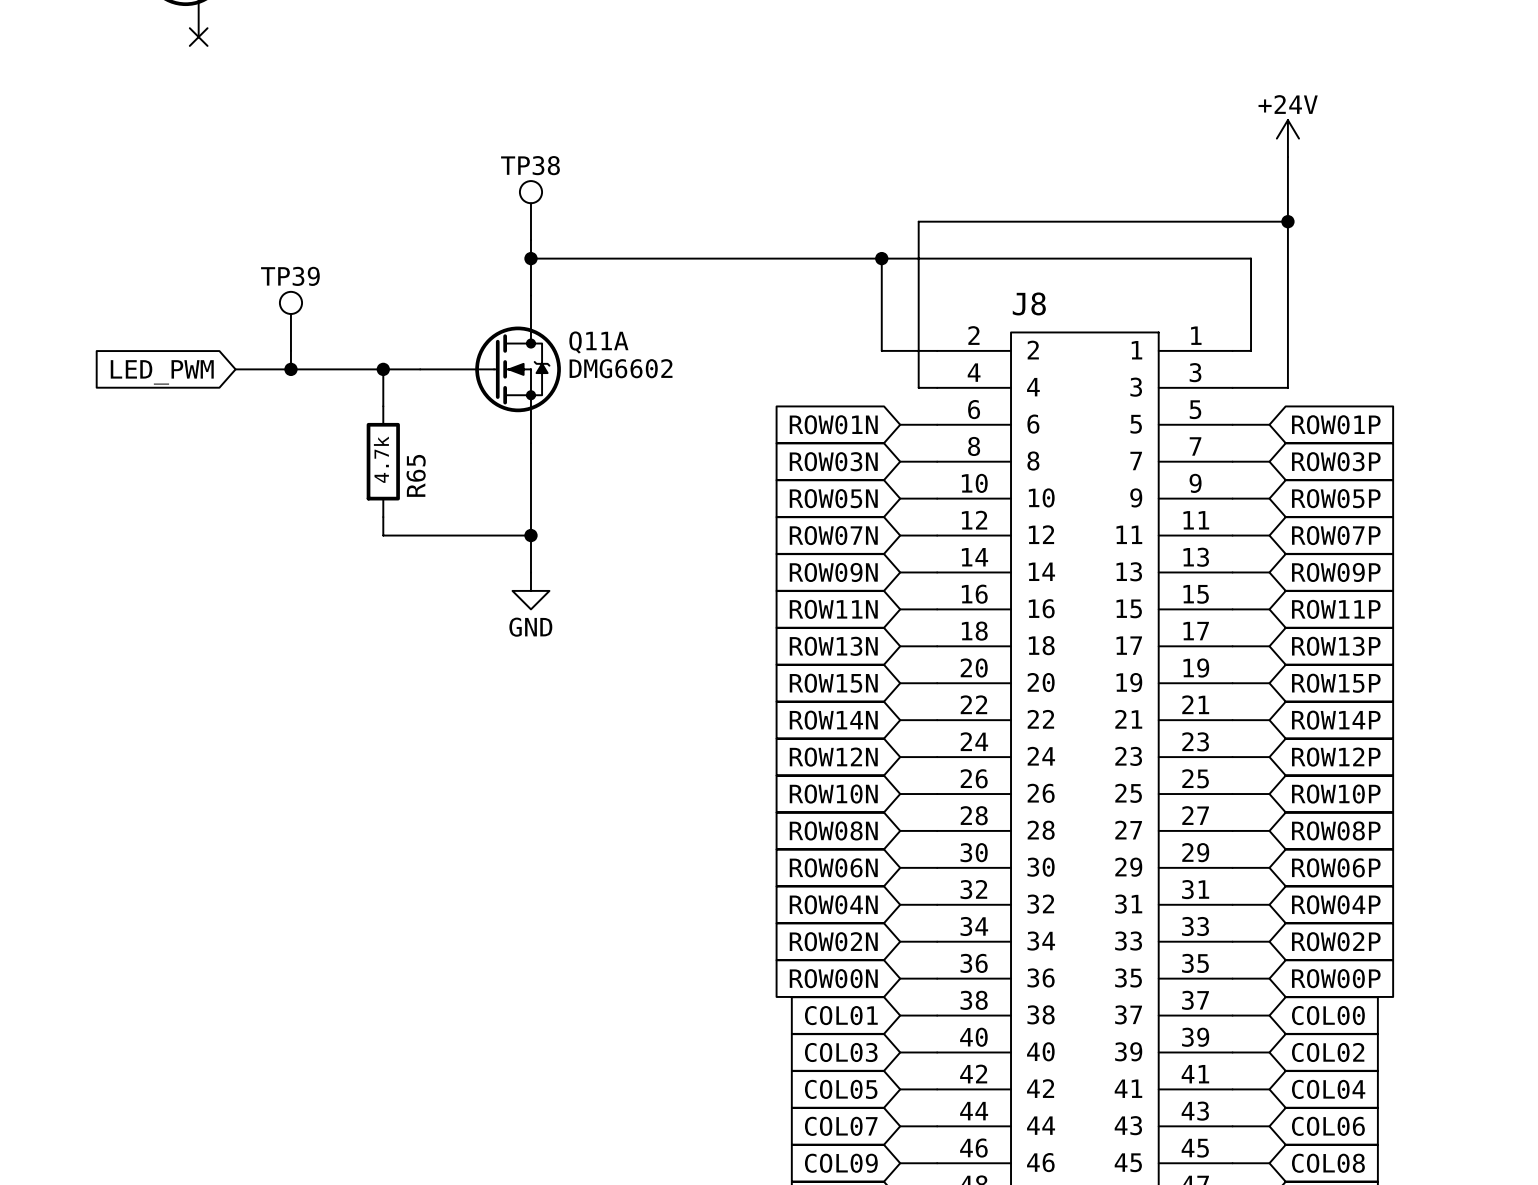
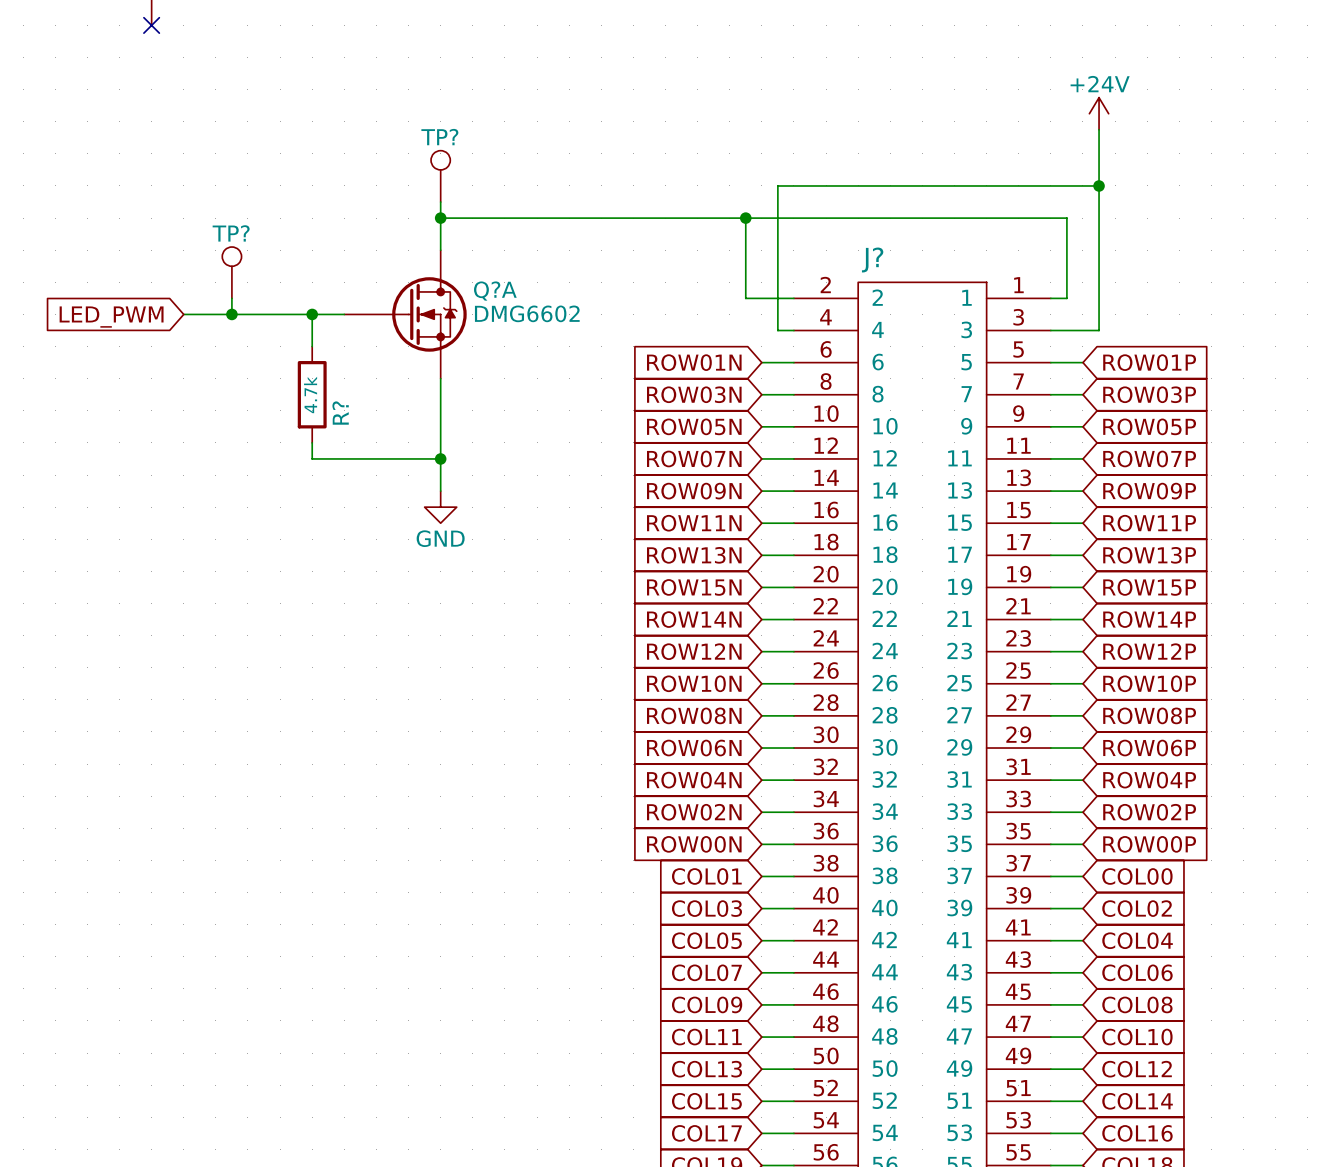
TP38 name: TP38 (530, 165) -> TP? (439, 137)
TP39 name: TP39 (290, 276) -> TP? (231, 233)
J8 name: J8 (1029, 303) -> J? (872, 260)
Q11A name: Q11A (598, 342) -> Q?A (495, 291)
R65 name: R65 (416, 475) -> R? (340, 413)

